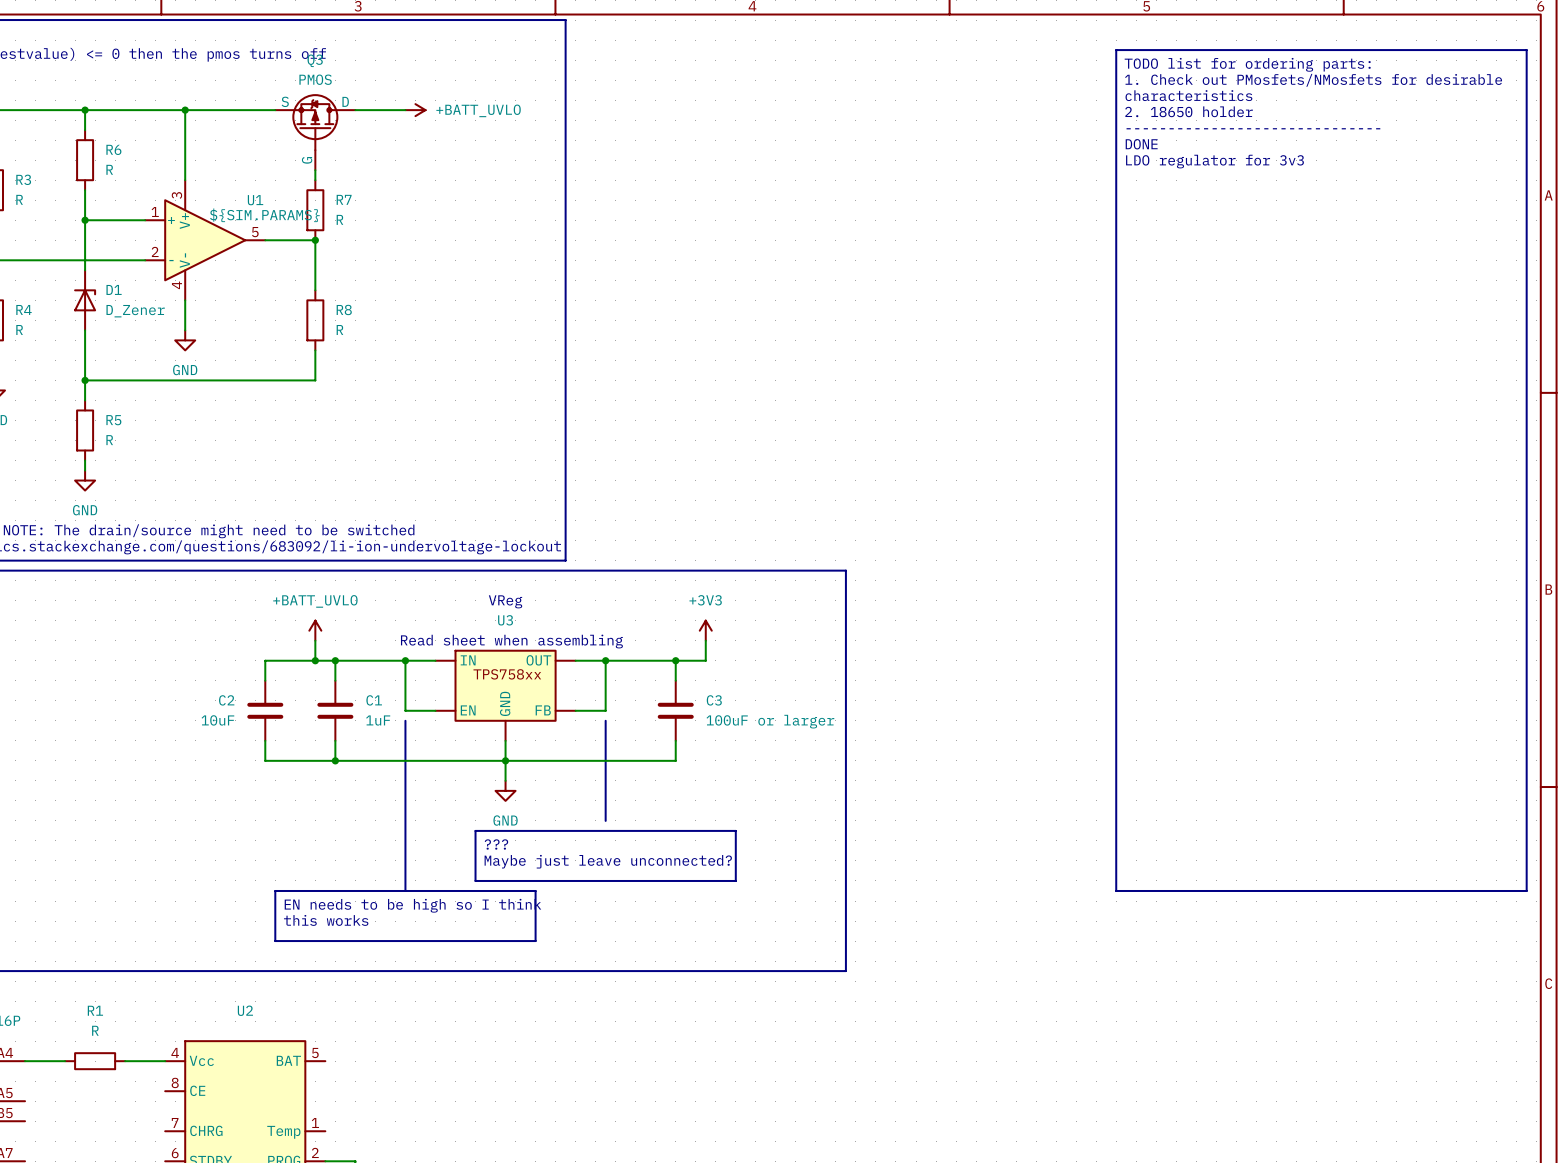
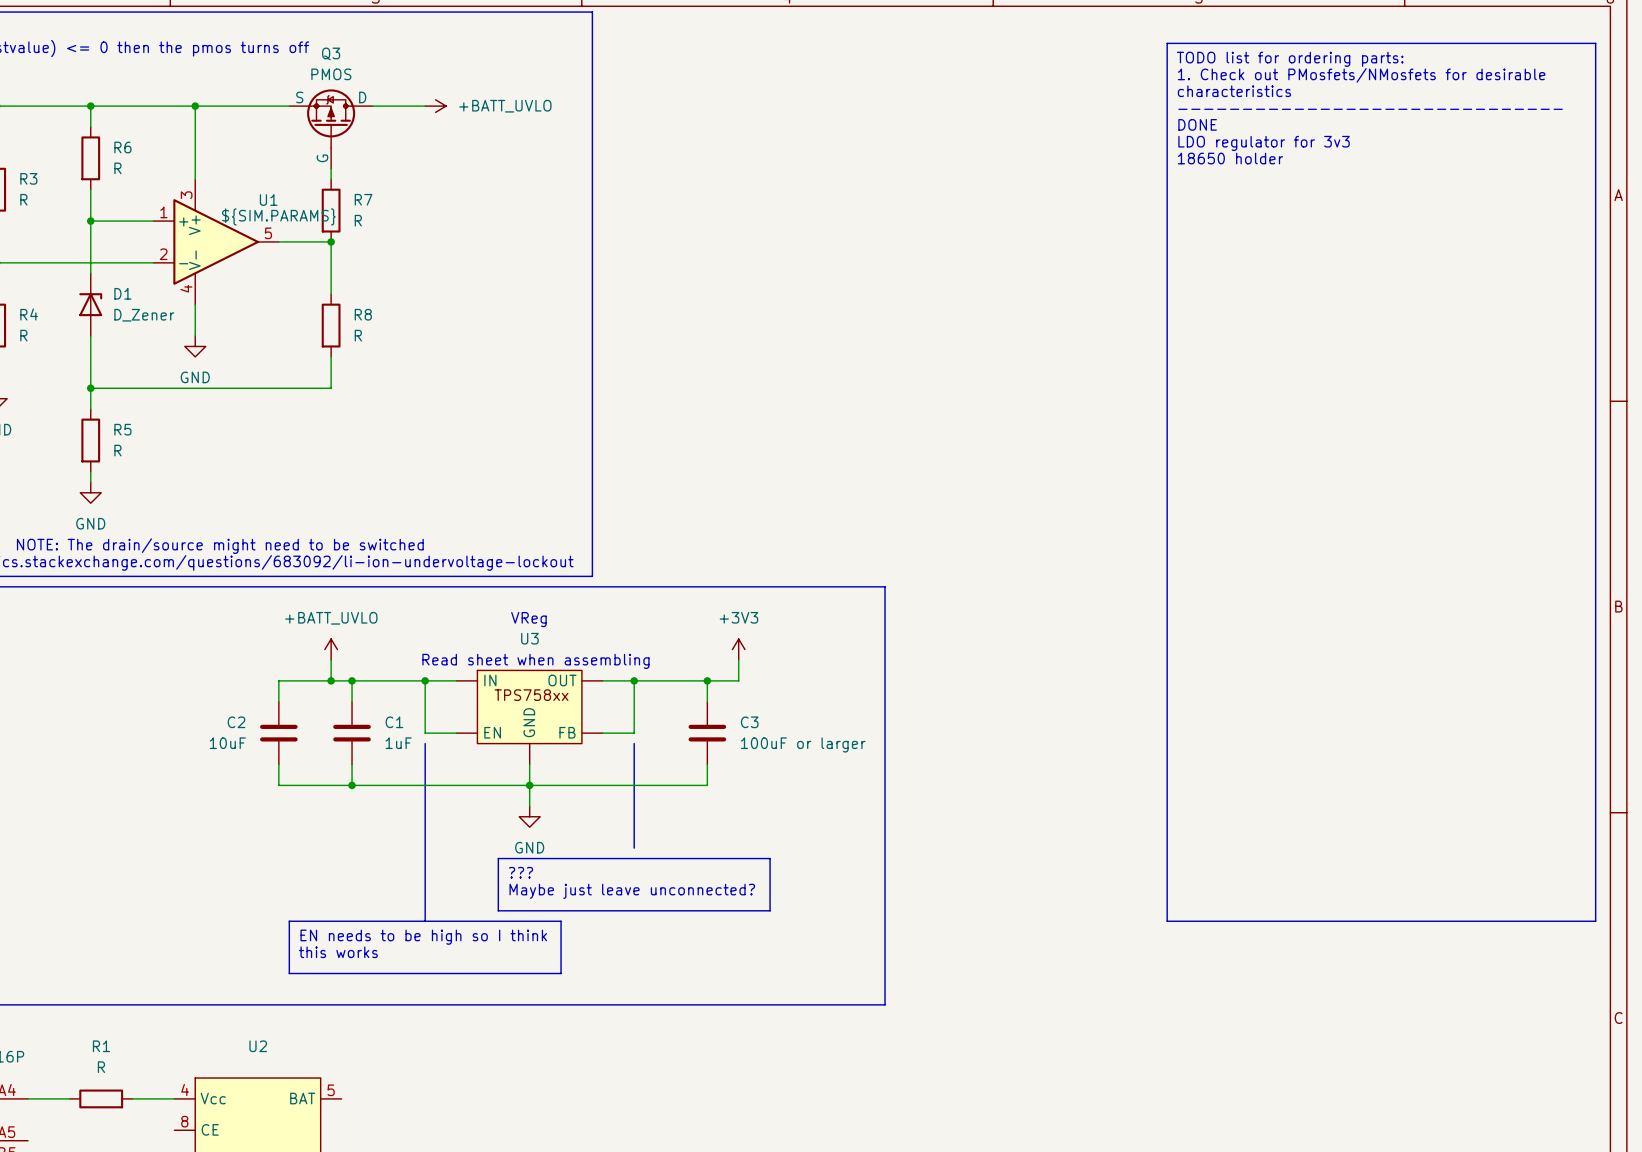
text: 2. 18650 holder (1189, 111) -> ------------------------------ (1370, 109)
text: ------------------------------ (1253, 128) -> DONE (1197, 124)
text: DONE (1141, 144) -> LDO regulator for 3v3 (1264, 143)
text: LDO regulator for 3v3 (1214, 161) -> 18650 holder (1230, 158)

